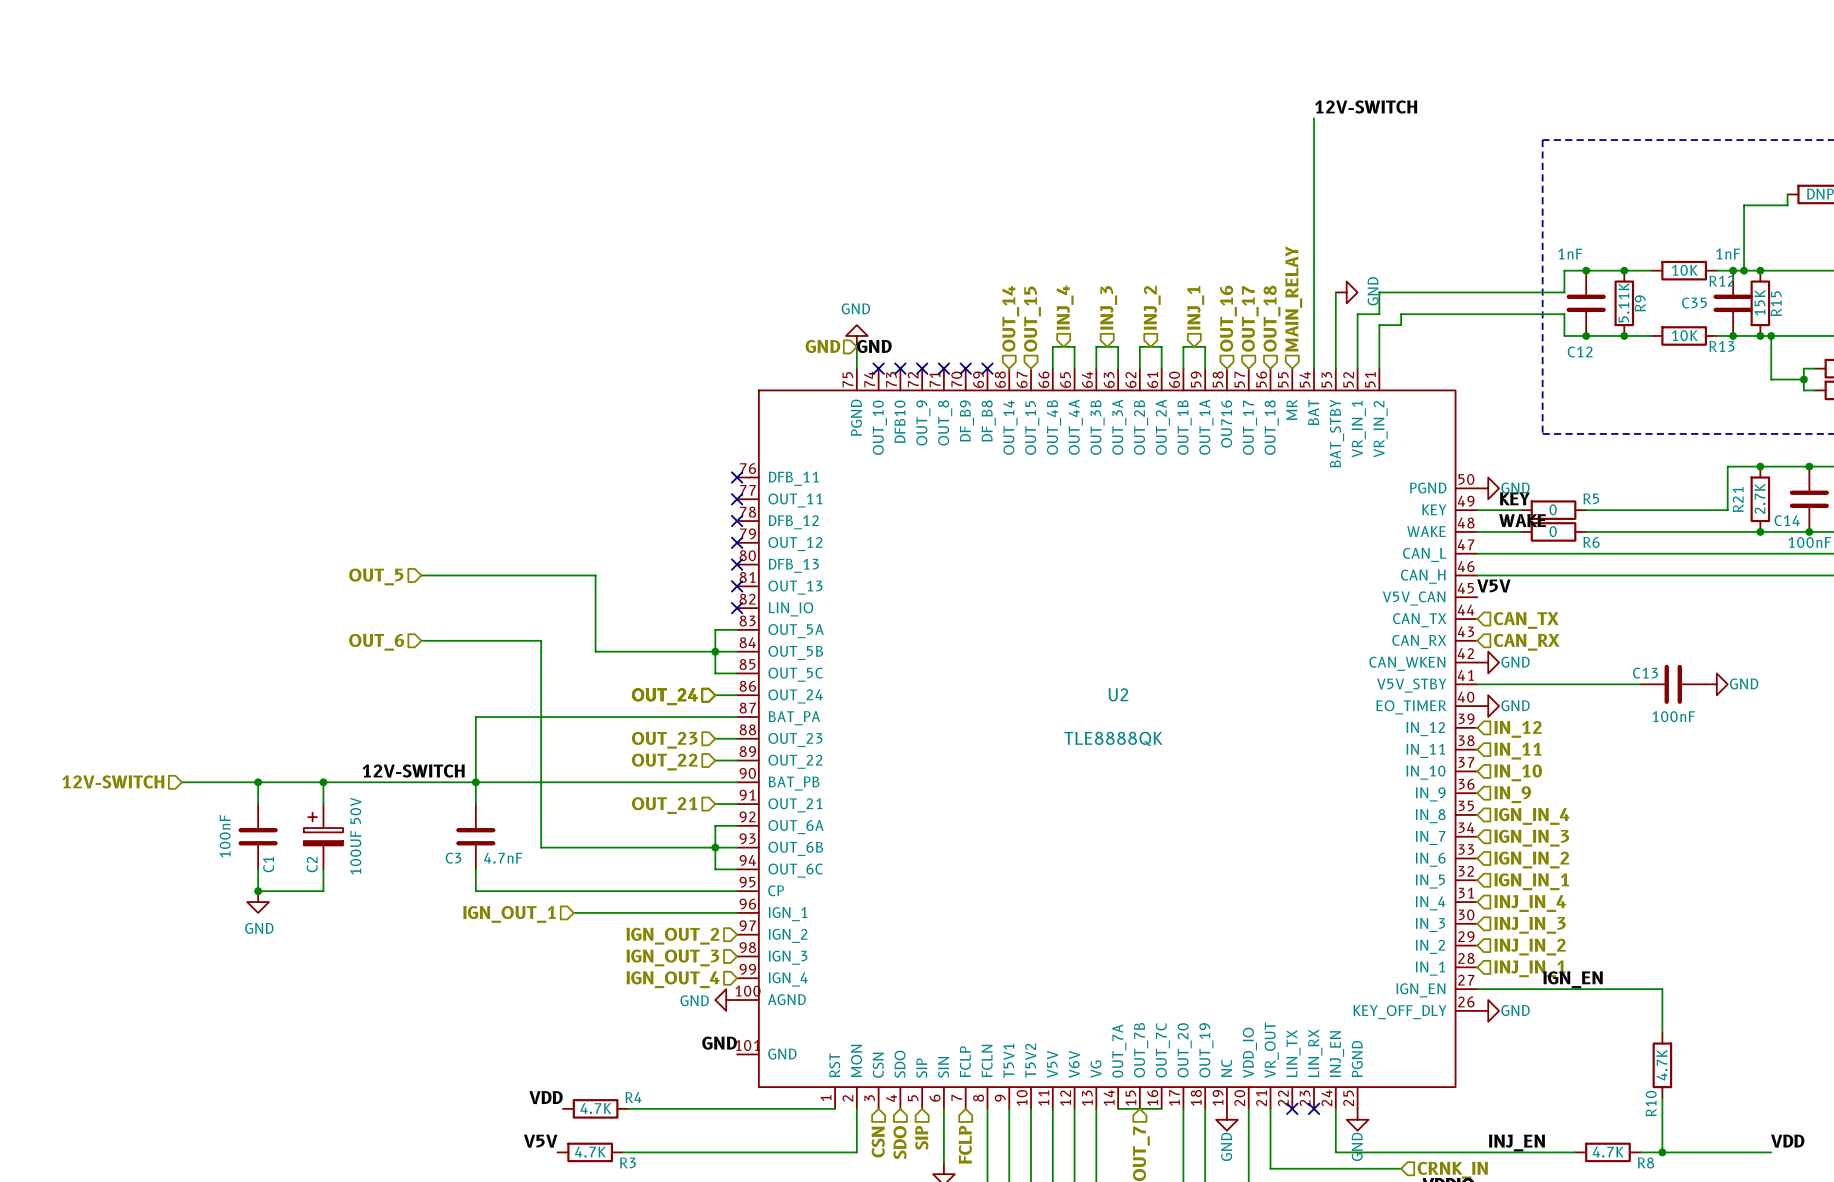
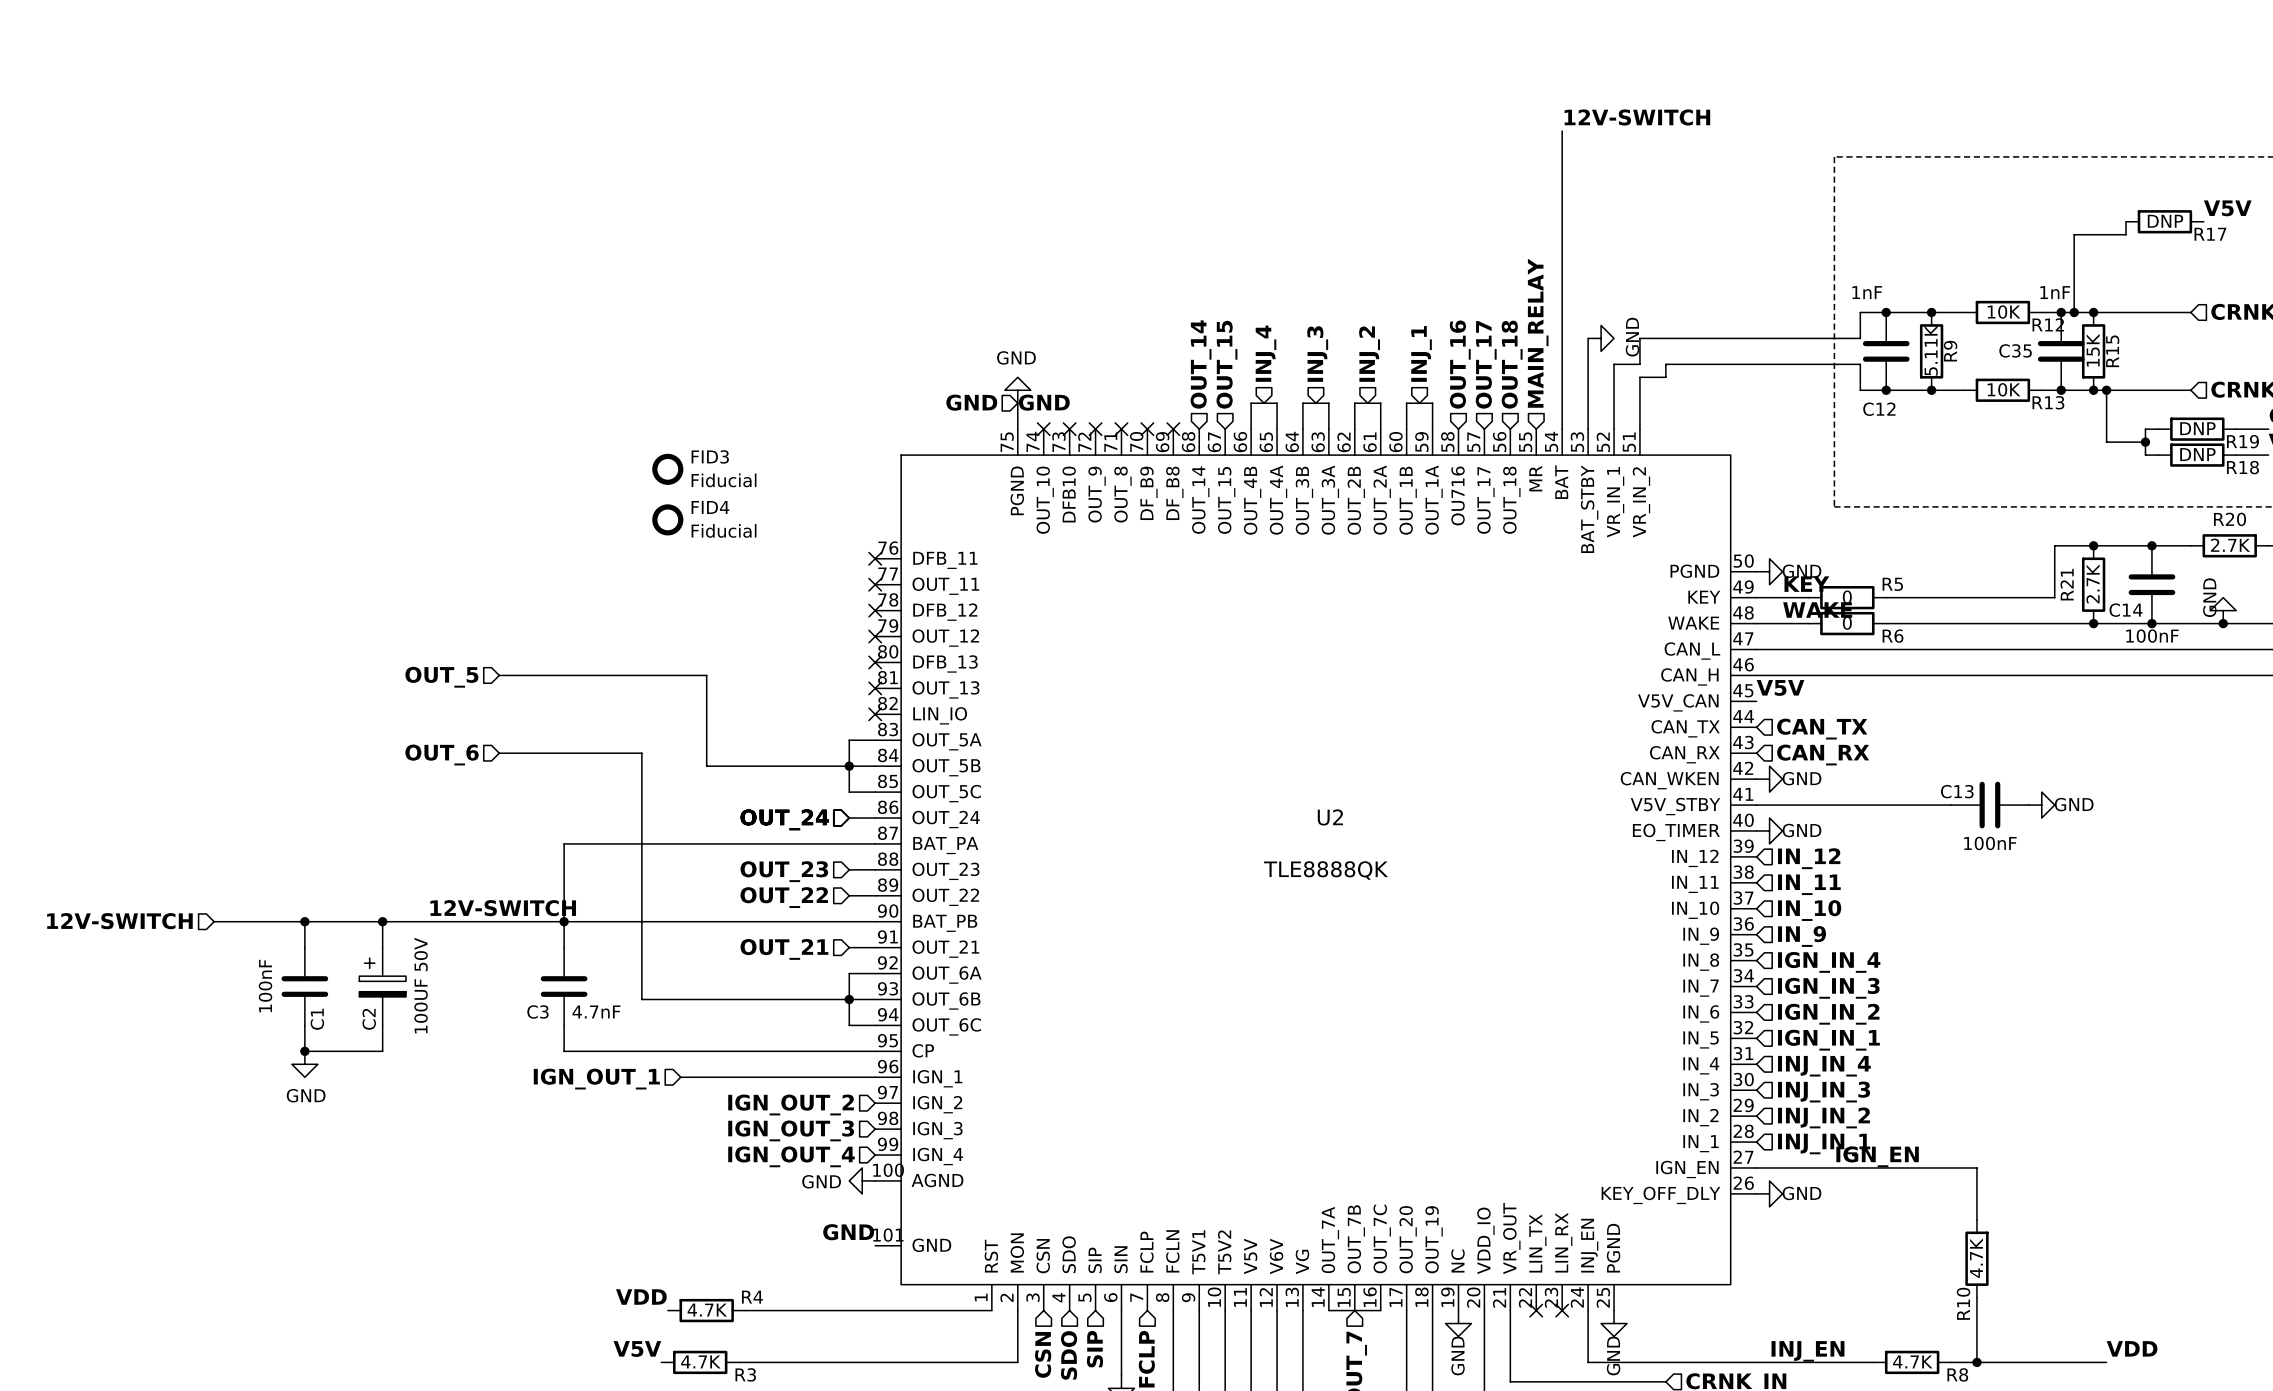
FID3: none -> Fiducial (667, 469)
FID4: none -> Fiducial (667, 519)

